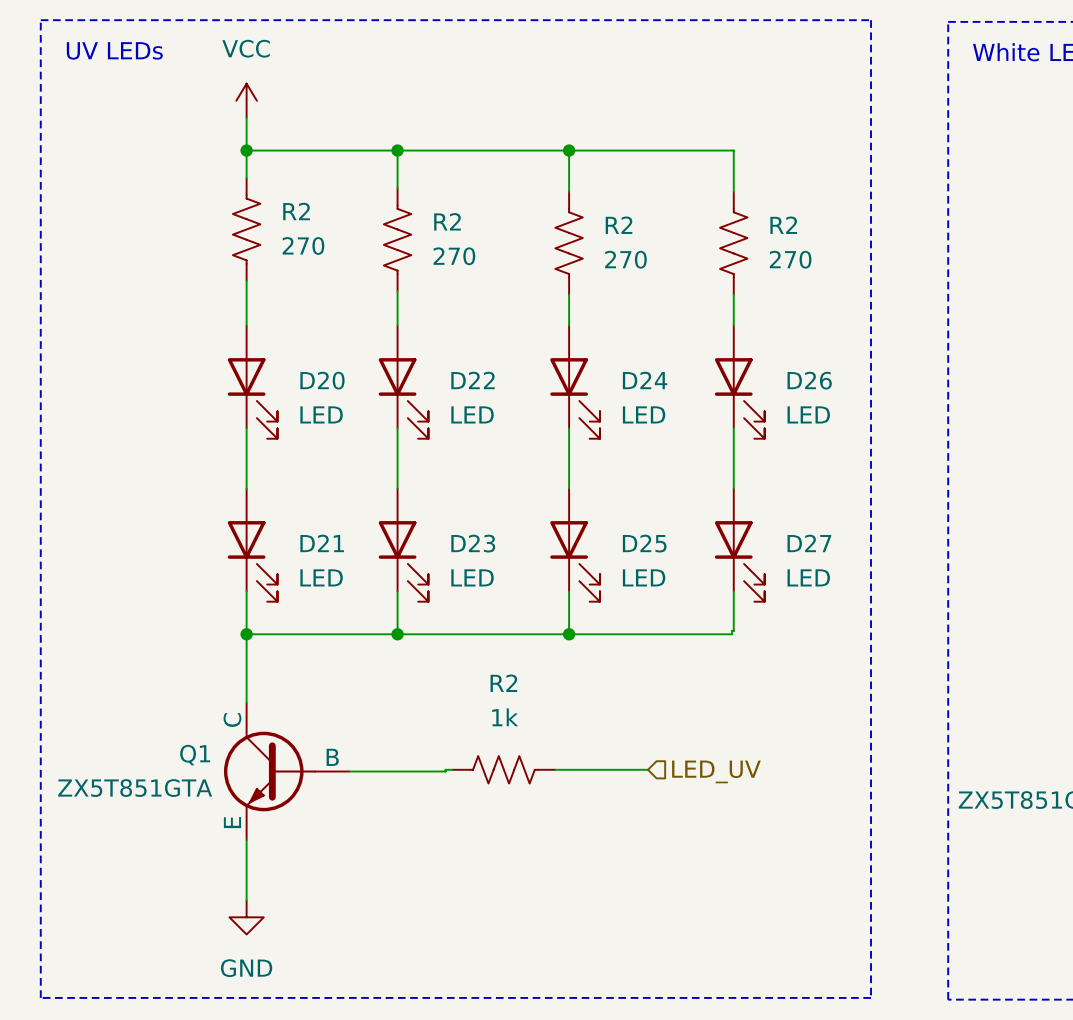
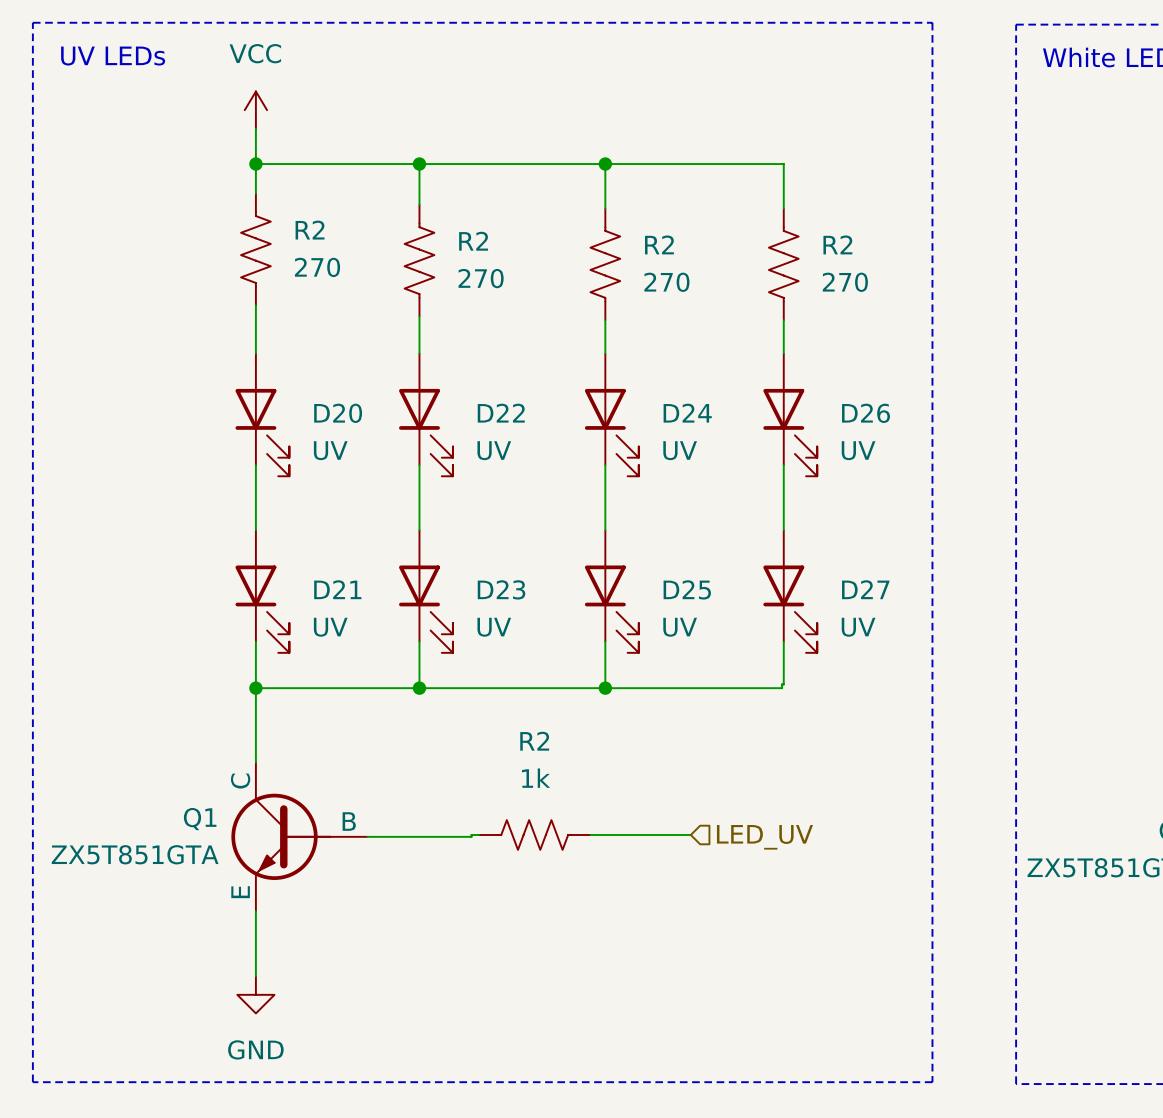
D20 value: LED (321, 414) -> UV (330, 450)
D22 value: LED (472, 414) -> UV (494, 450)
D24 value: LED (644, 414) -> UV (680, 450)
D26 value: LED (808, 414) -> UV (858, 450)
D21 value: LED (321, 577) -> UV (330, 627)
D23 value: LED (472, 577) -> UV (494, 627)
D25 value: LED (644, 577) -> UV (680, 627)
D27 value: LED (808, 577) -> UV (858, 627)

